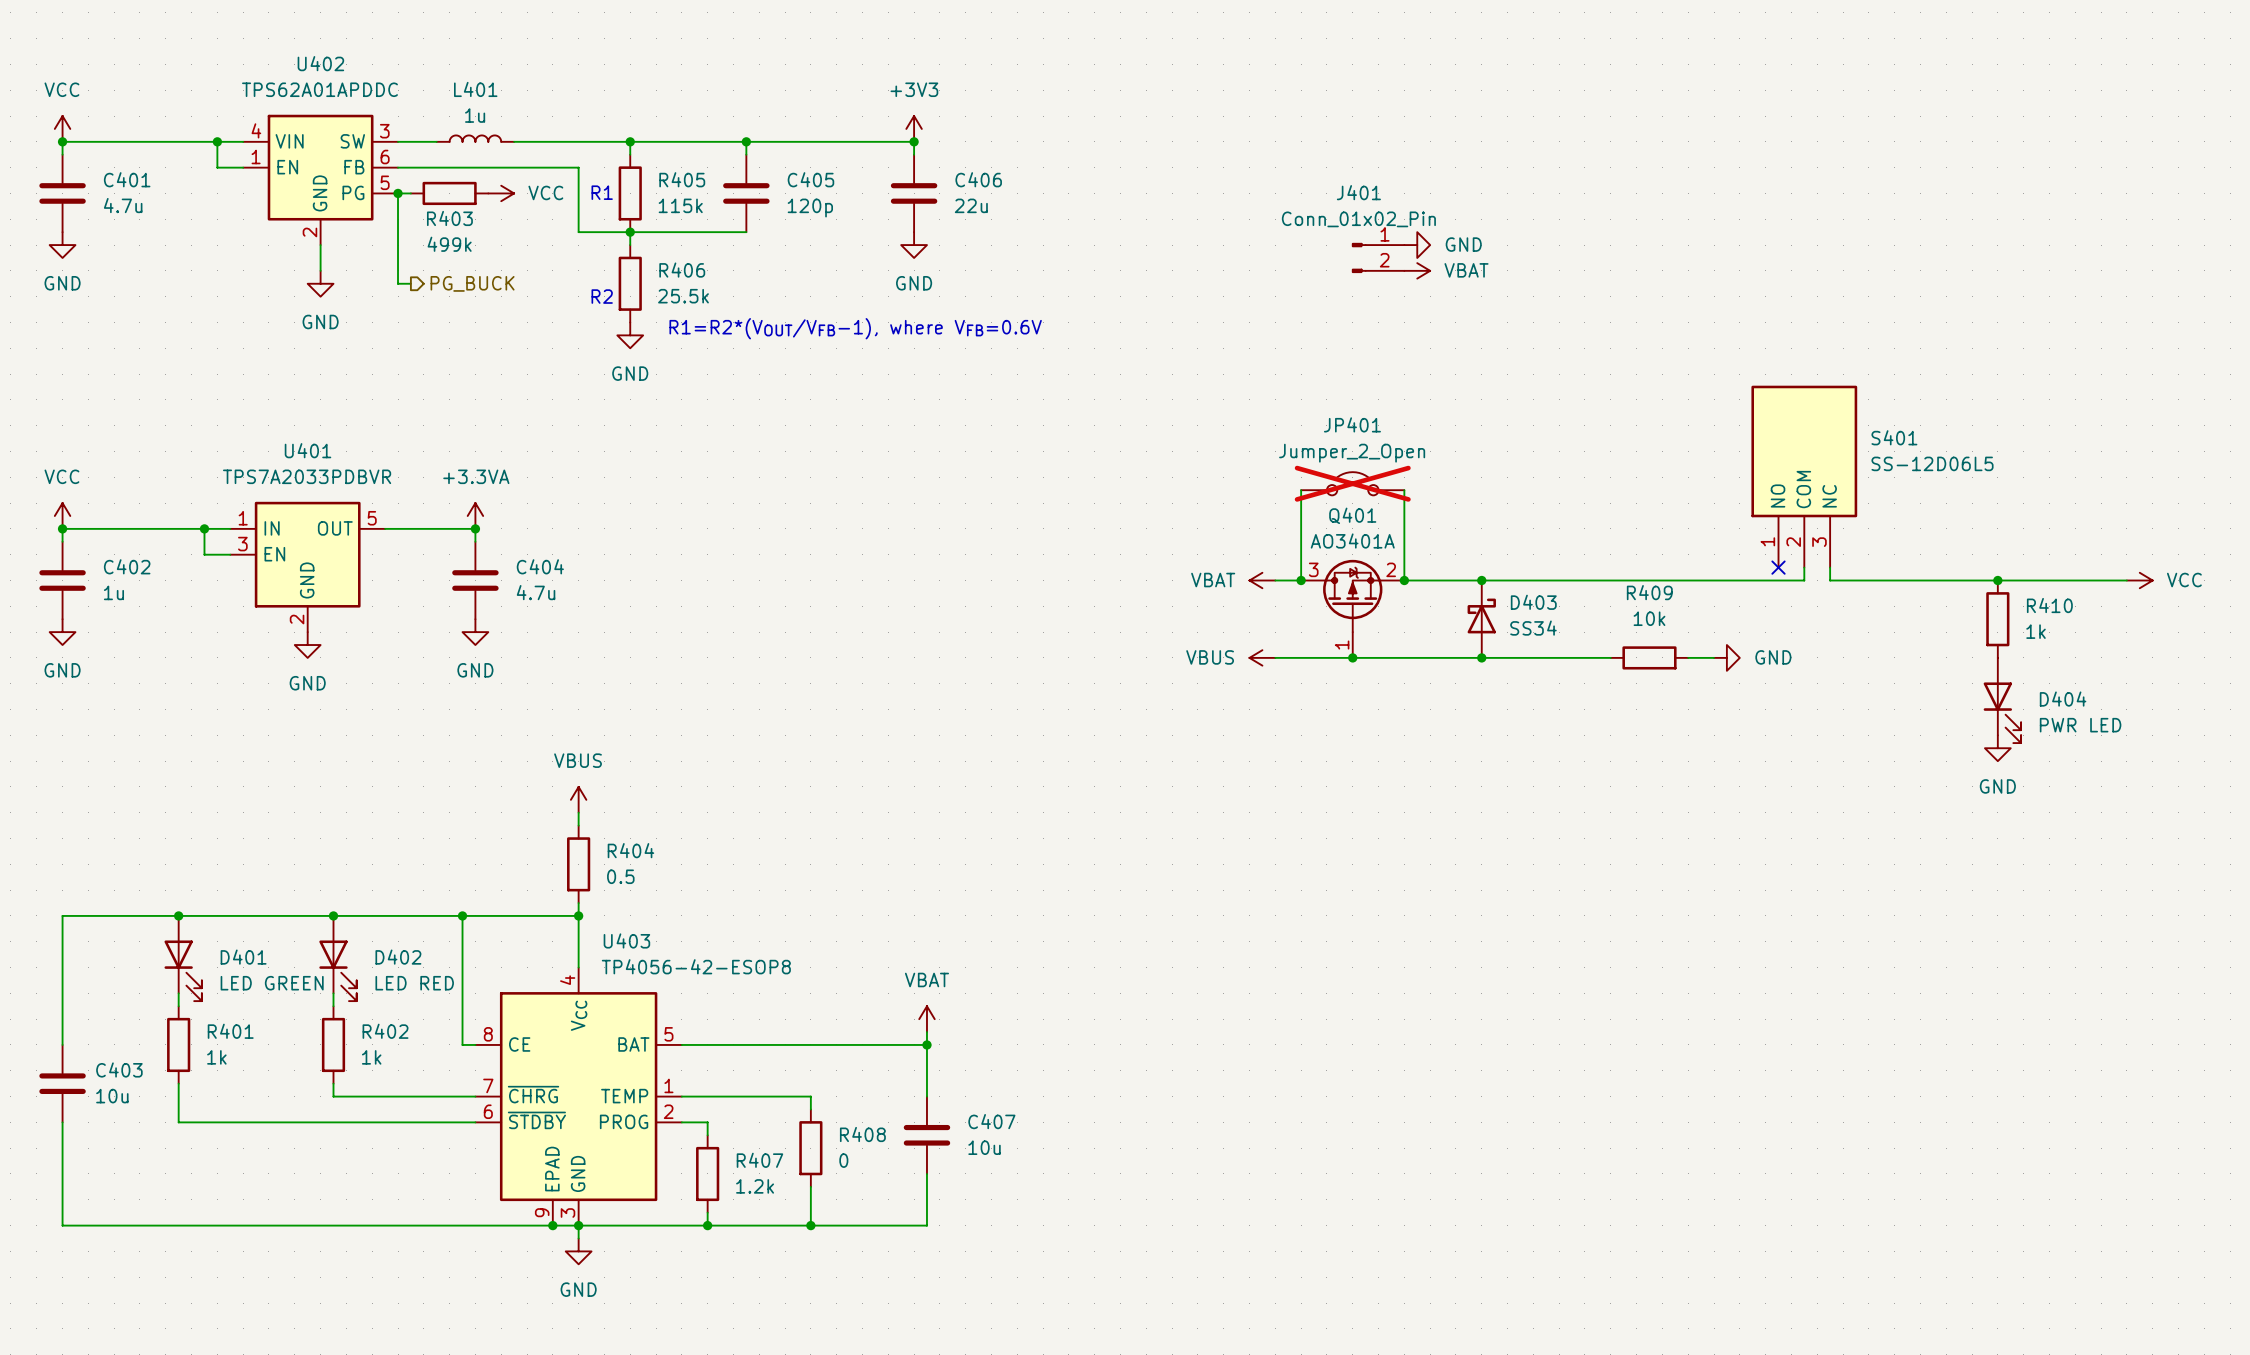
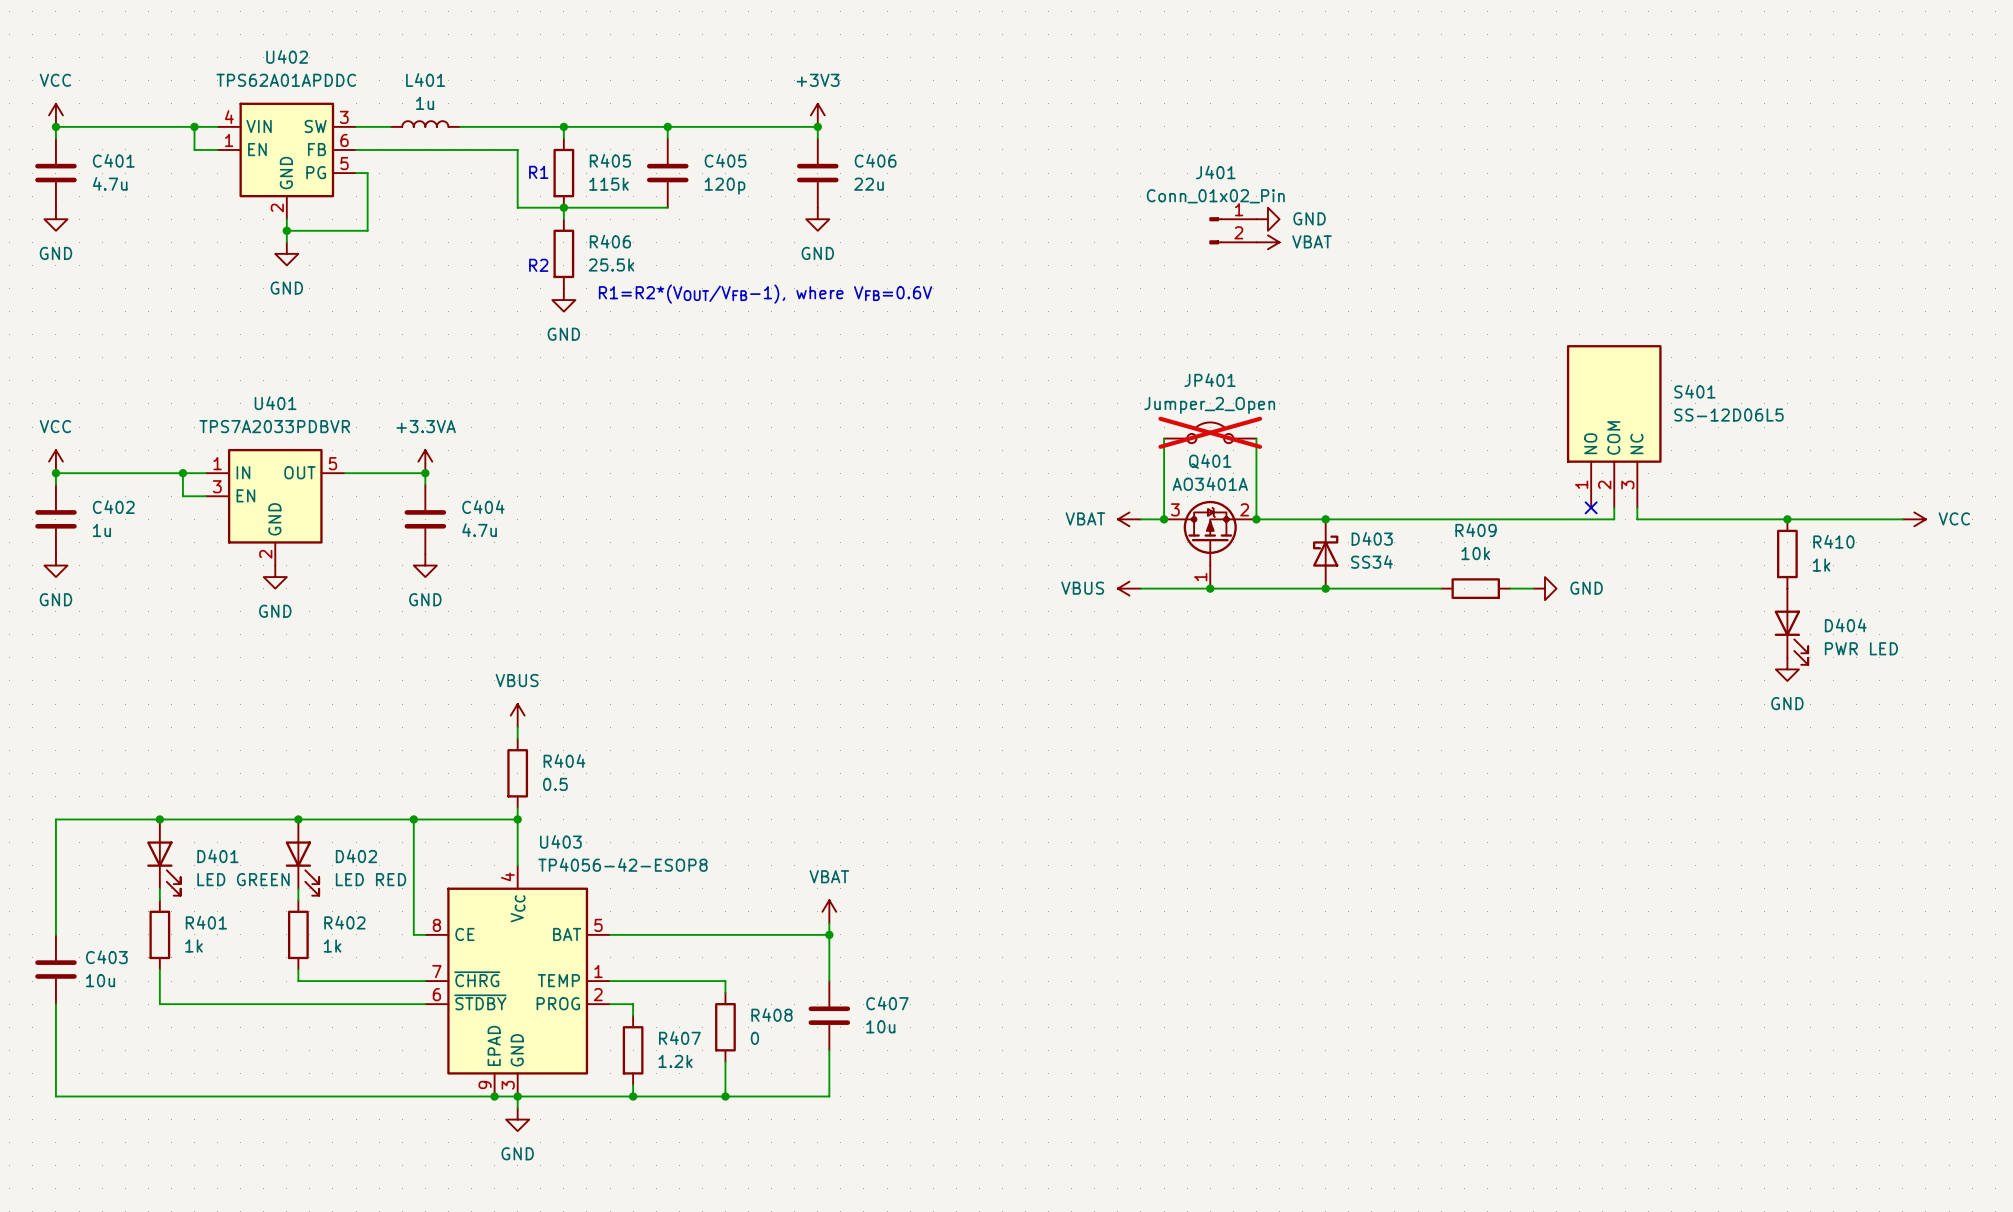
wire: (398, 193) (398, 283) (410, 283) -> none
junction: (398, 193) -> none
wire: none -> (367, 173) (367, 230) (286, 230)
R403: 499k (449, 193) -> none
power symbol: VCC (501, 193) -> none
junction: none -> (286, 230)
hierarchical label: PG_BUCK (472, 283) -> none

